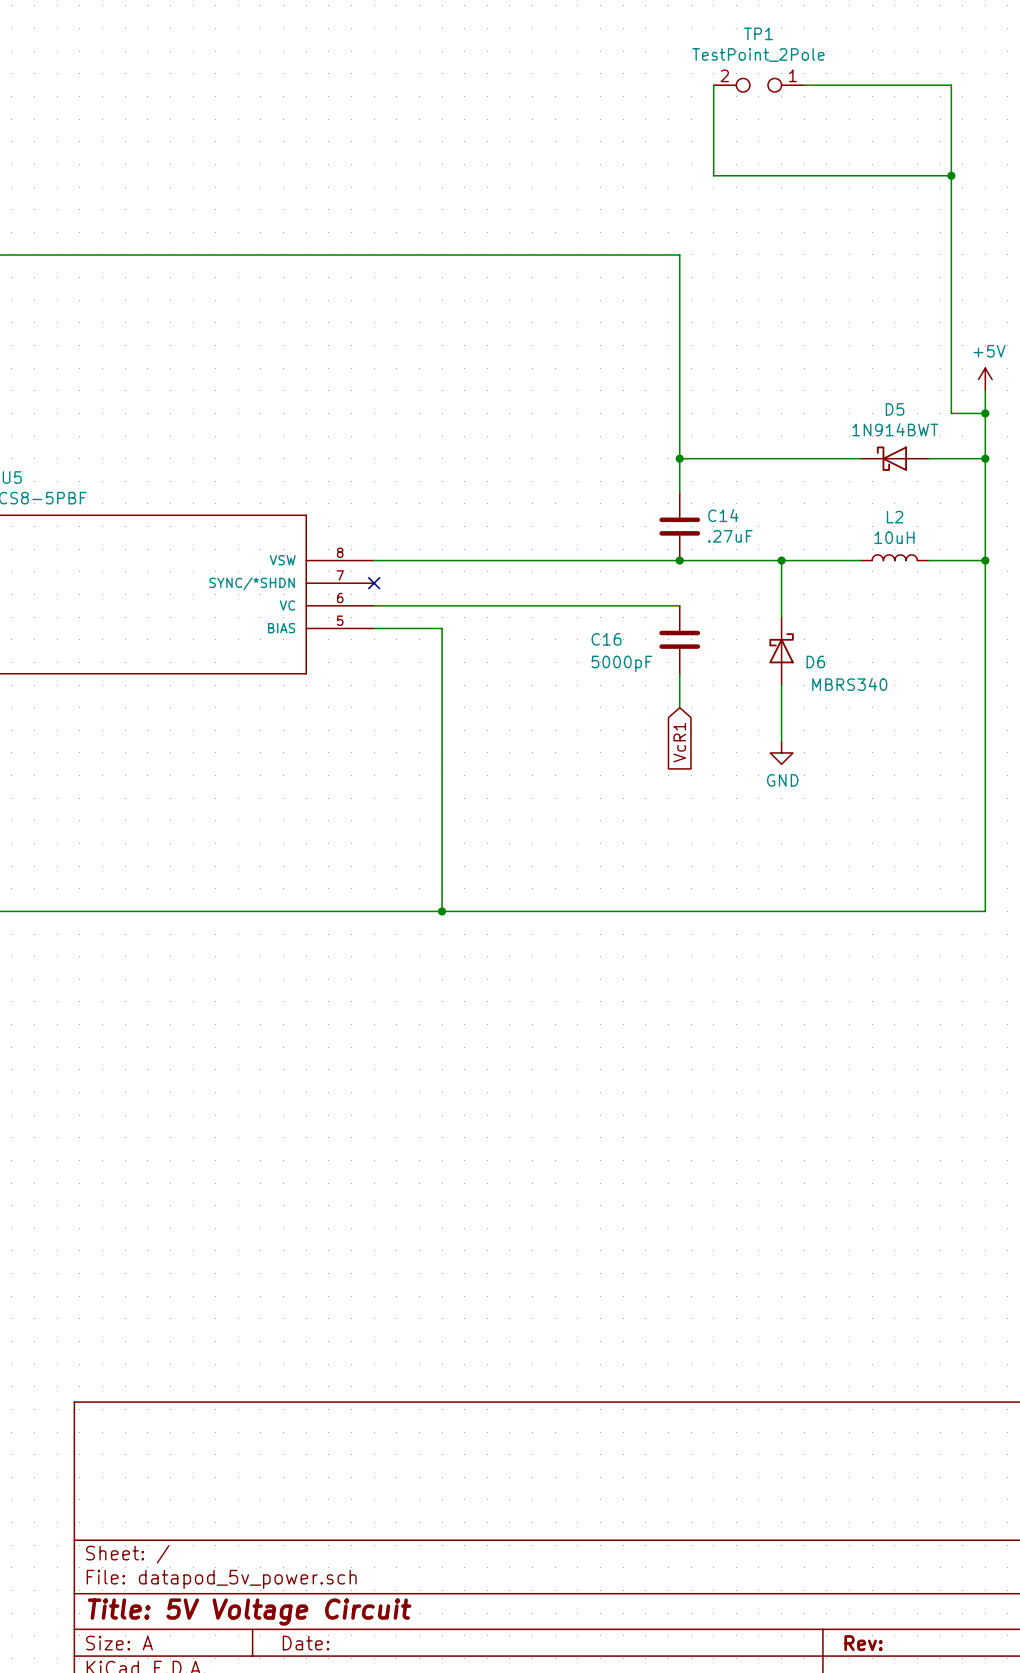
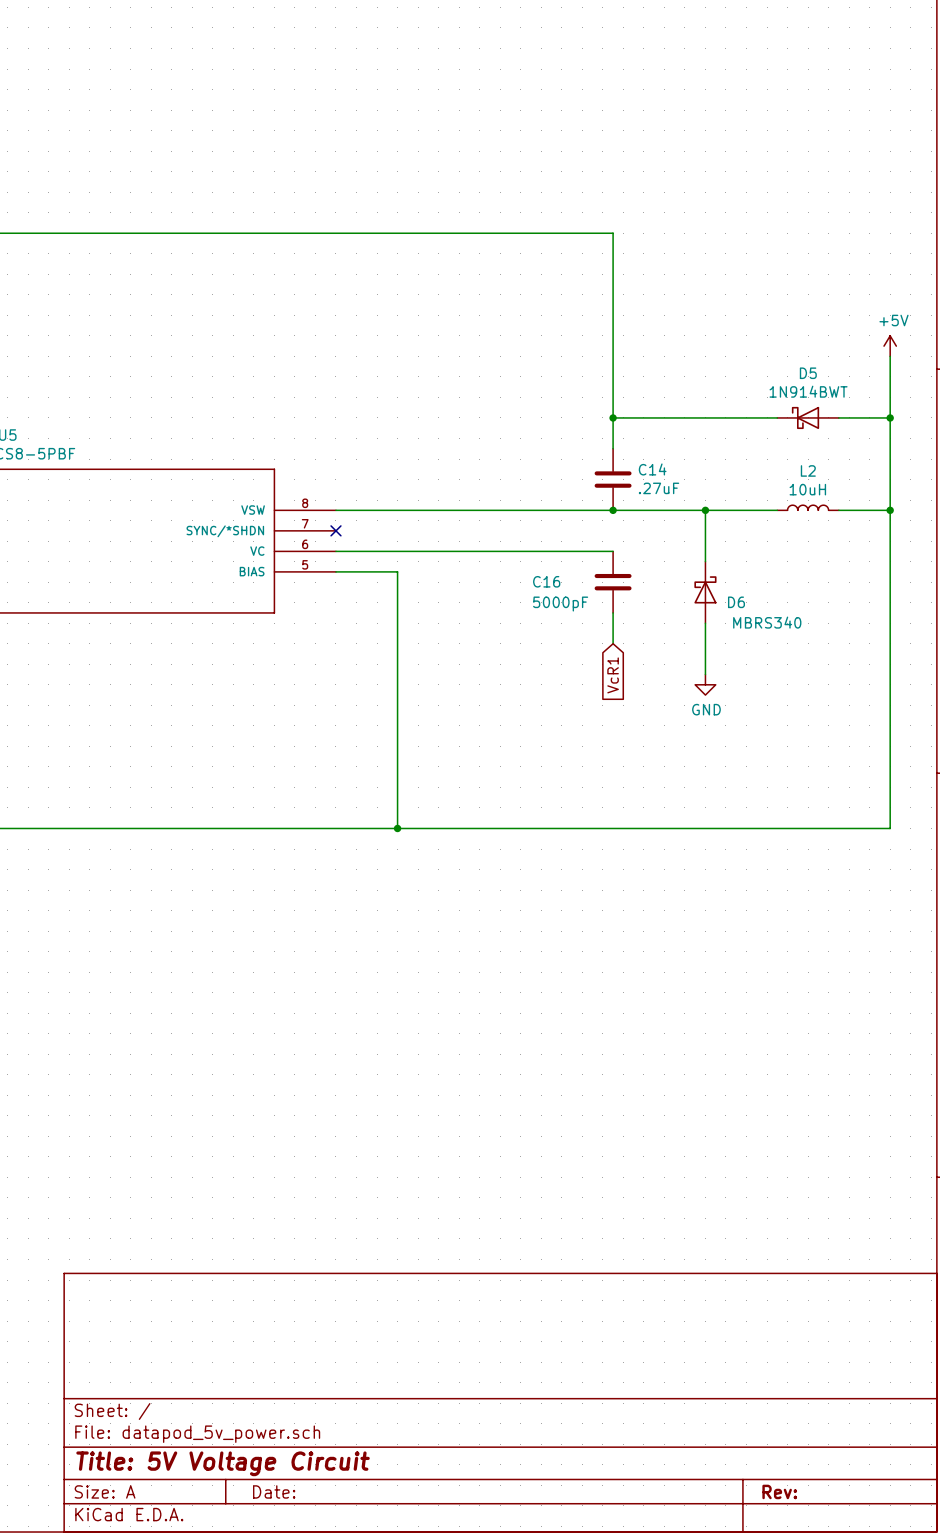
wire: (713, 85) (713, 175) (951, 175) -> none
TP1: TestPoint_2Pole (758, 85) -> none
wire: (804, 85) (951, 85) (951, 413) (985, 413) -> none
junction: (951, 175) -> none
junction: (985, 413) -> none

